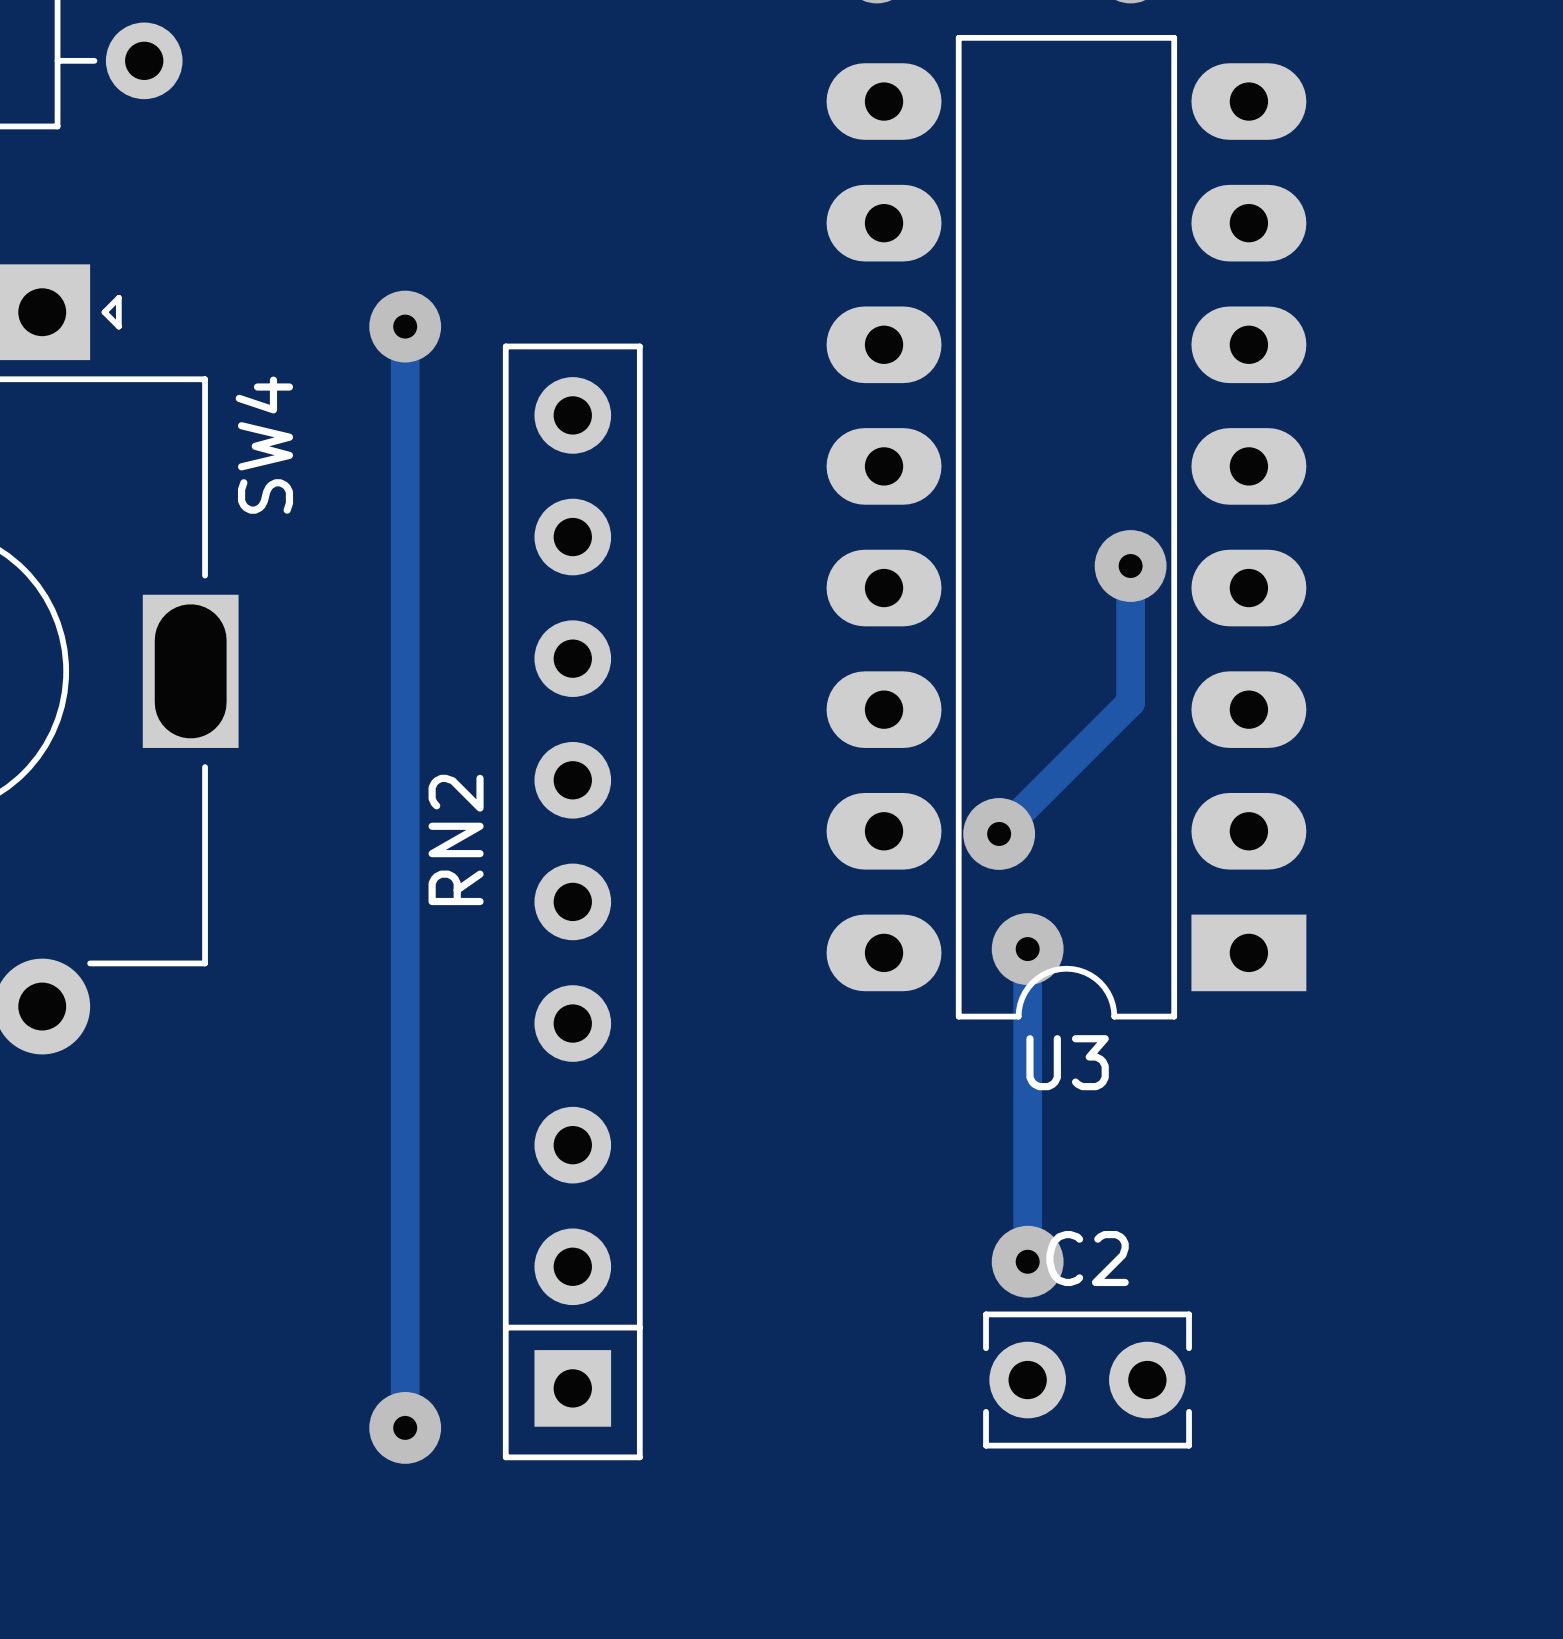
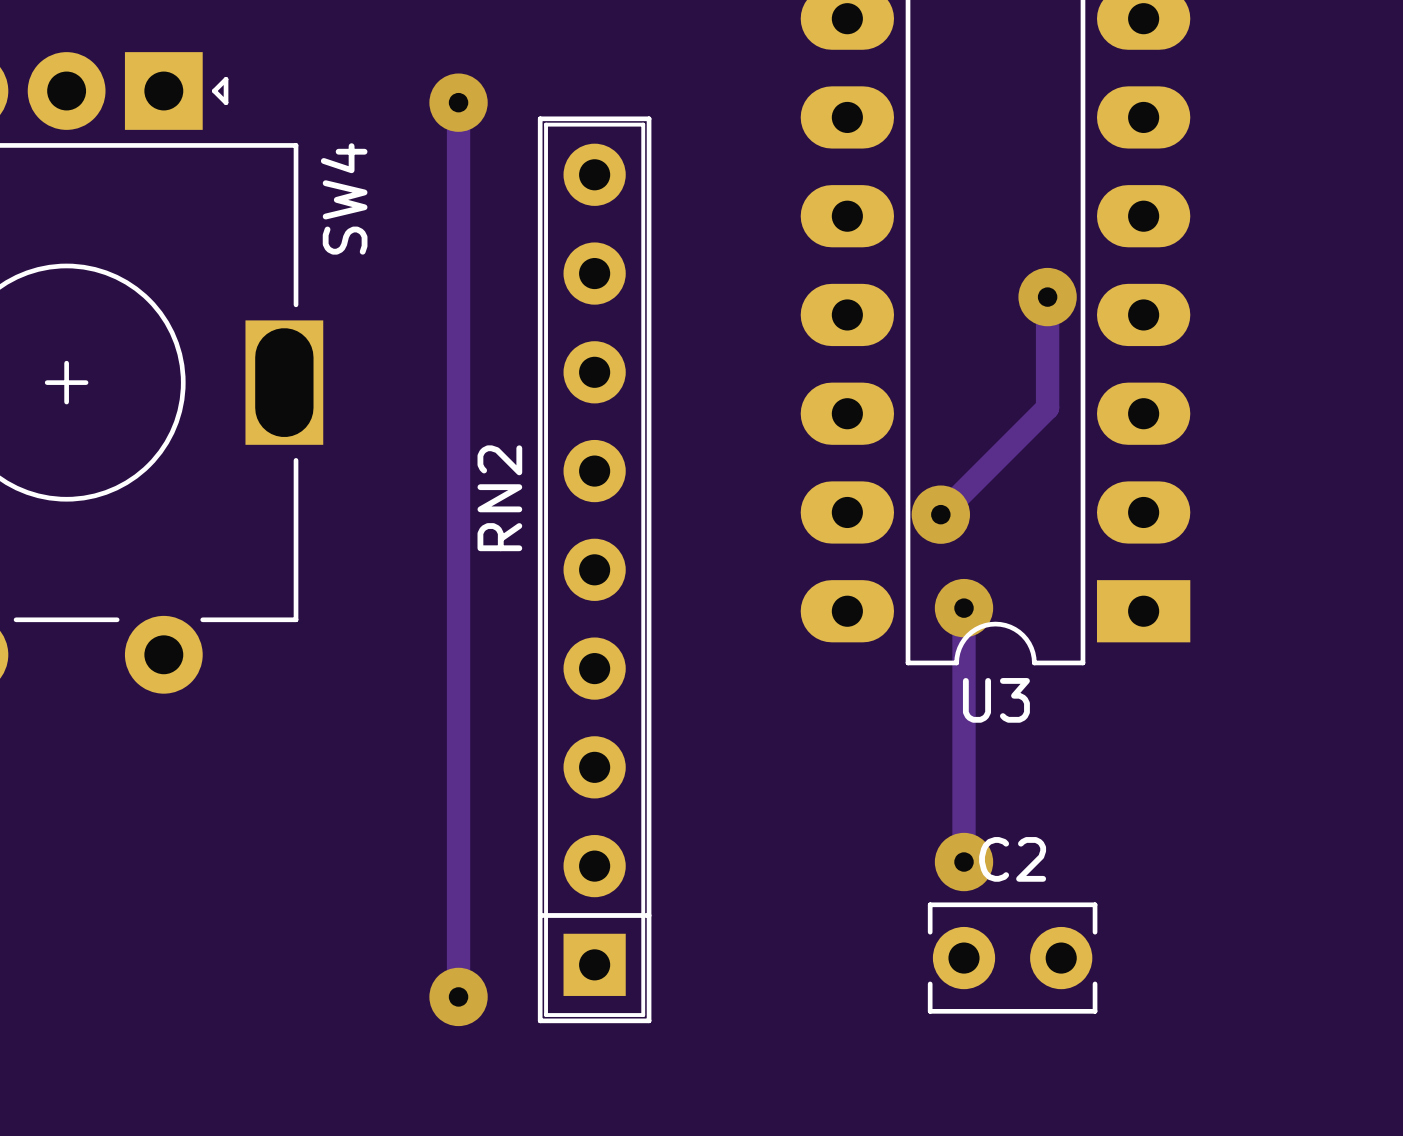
RN2 footprint: [502, 343, 643, 1461] -> [537, 116, 652, 1024]
RN2 name position: RN2 (456, 839) -> RN2 (499, 498)

